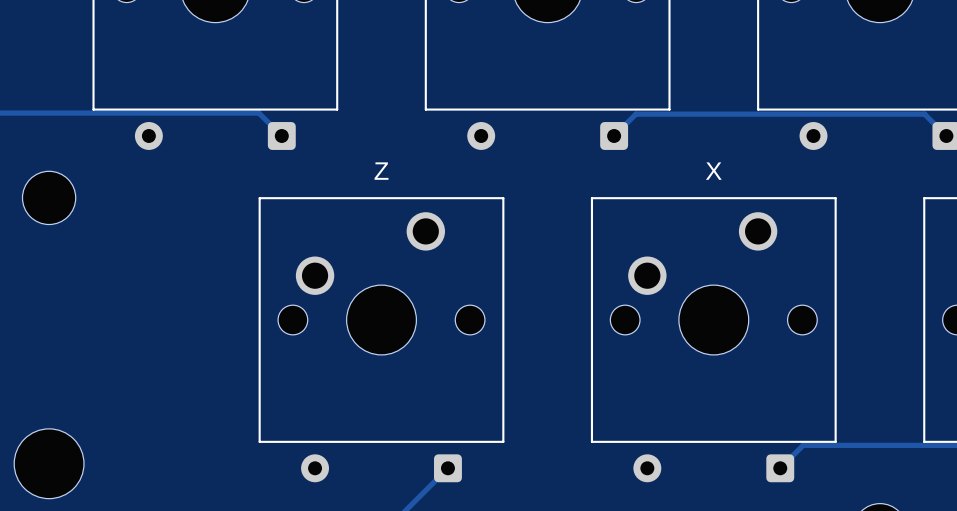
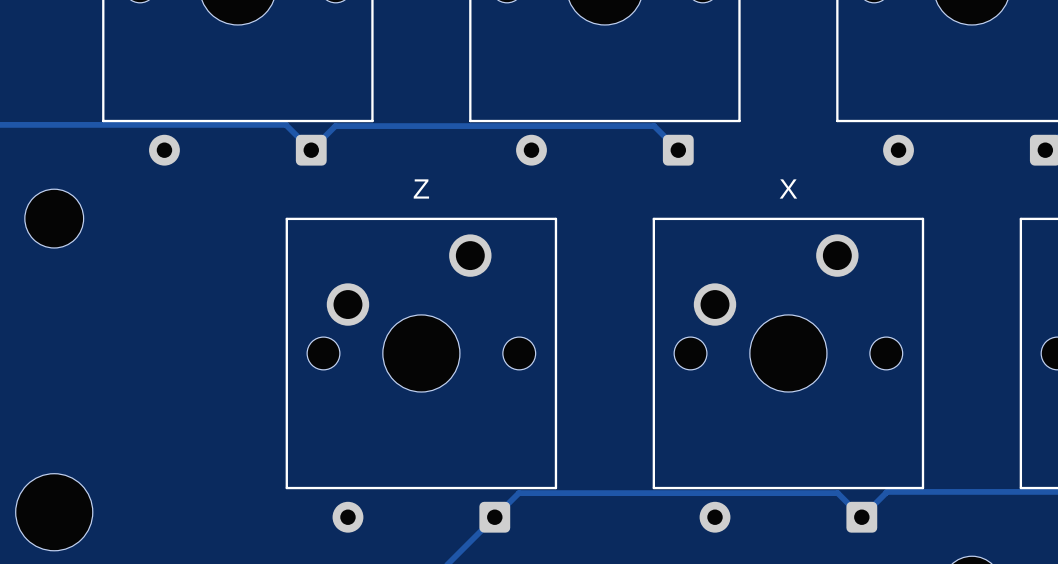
track: (614, 135) (635, 114) (924, 114) (946, 135) -> (678, 150) (654, 126) (335, 126) (311, 150)
track: none -> (494, 517) (518, 493) (837, 493) (861, 517)

